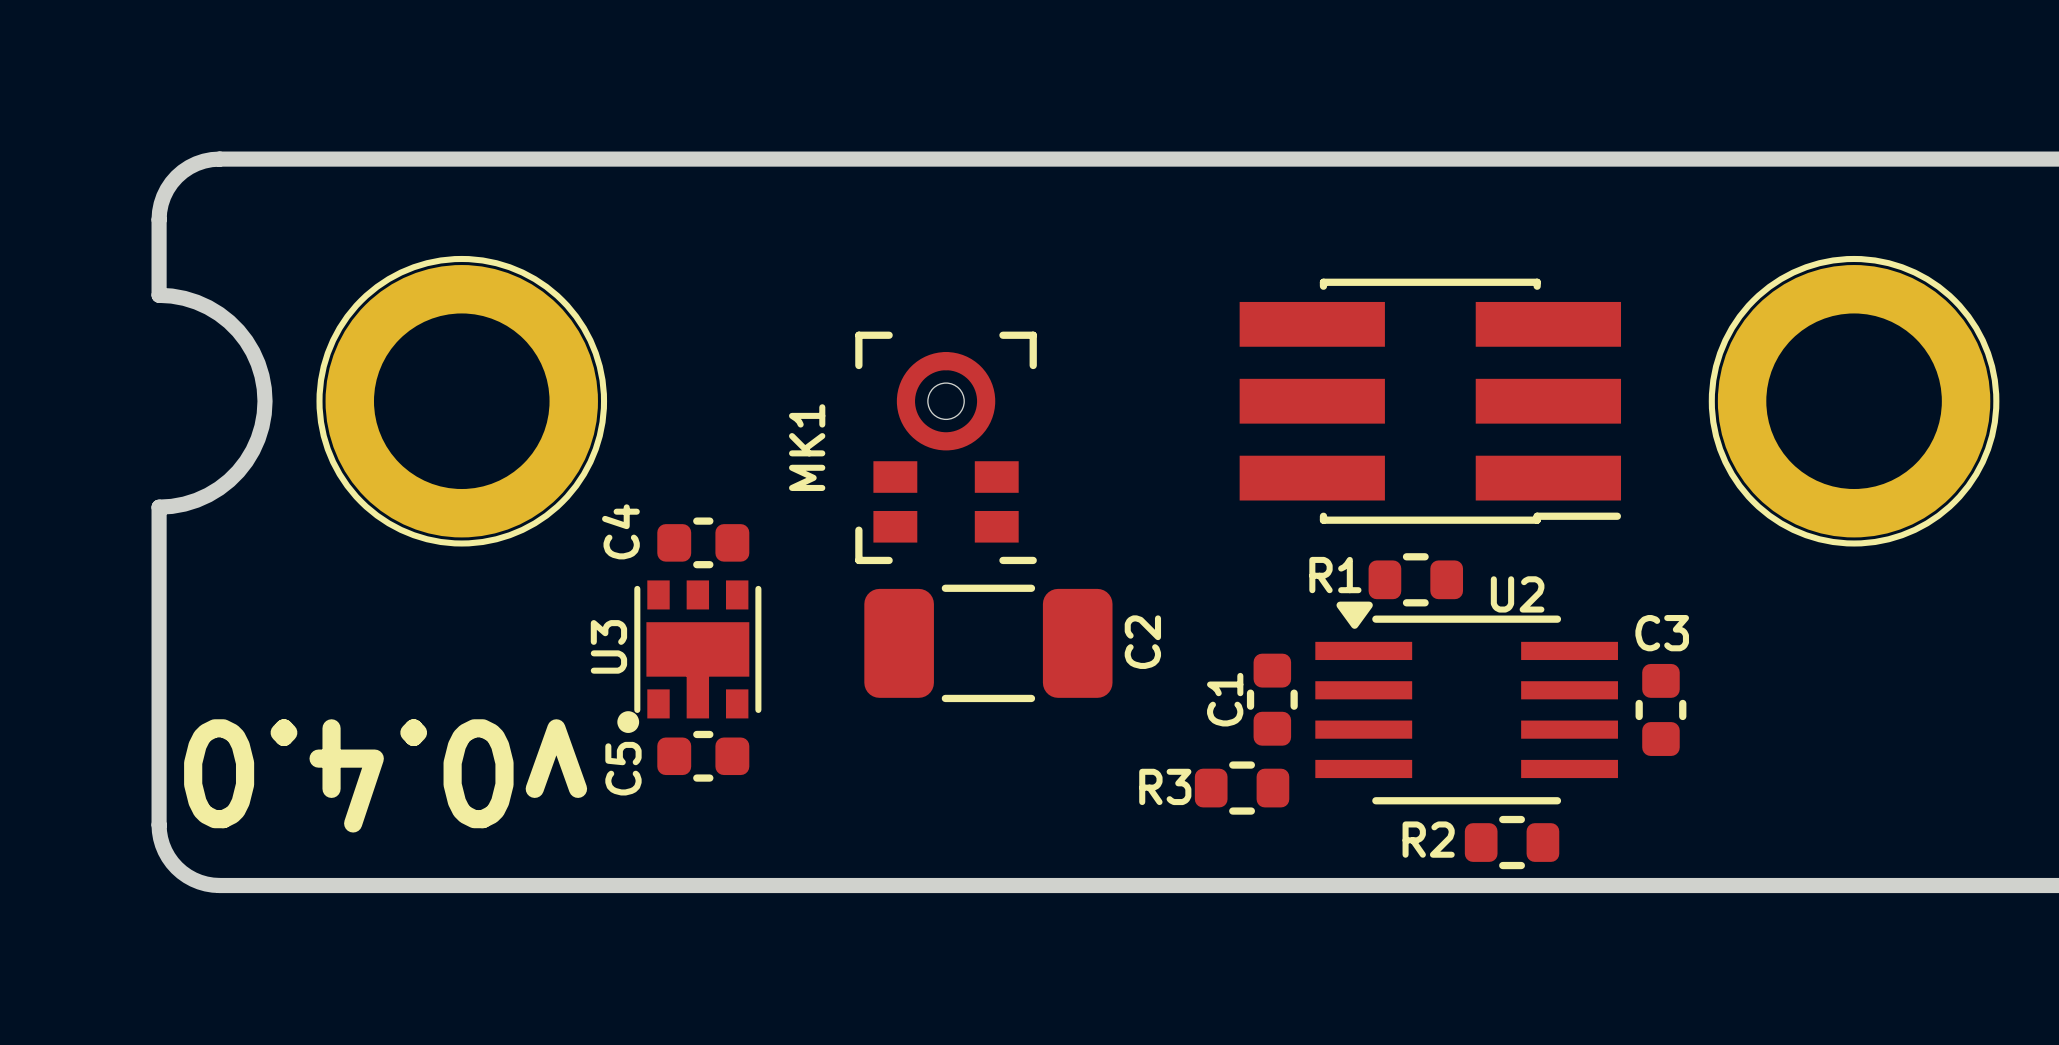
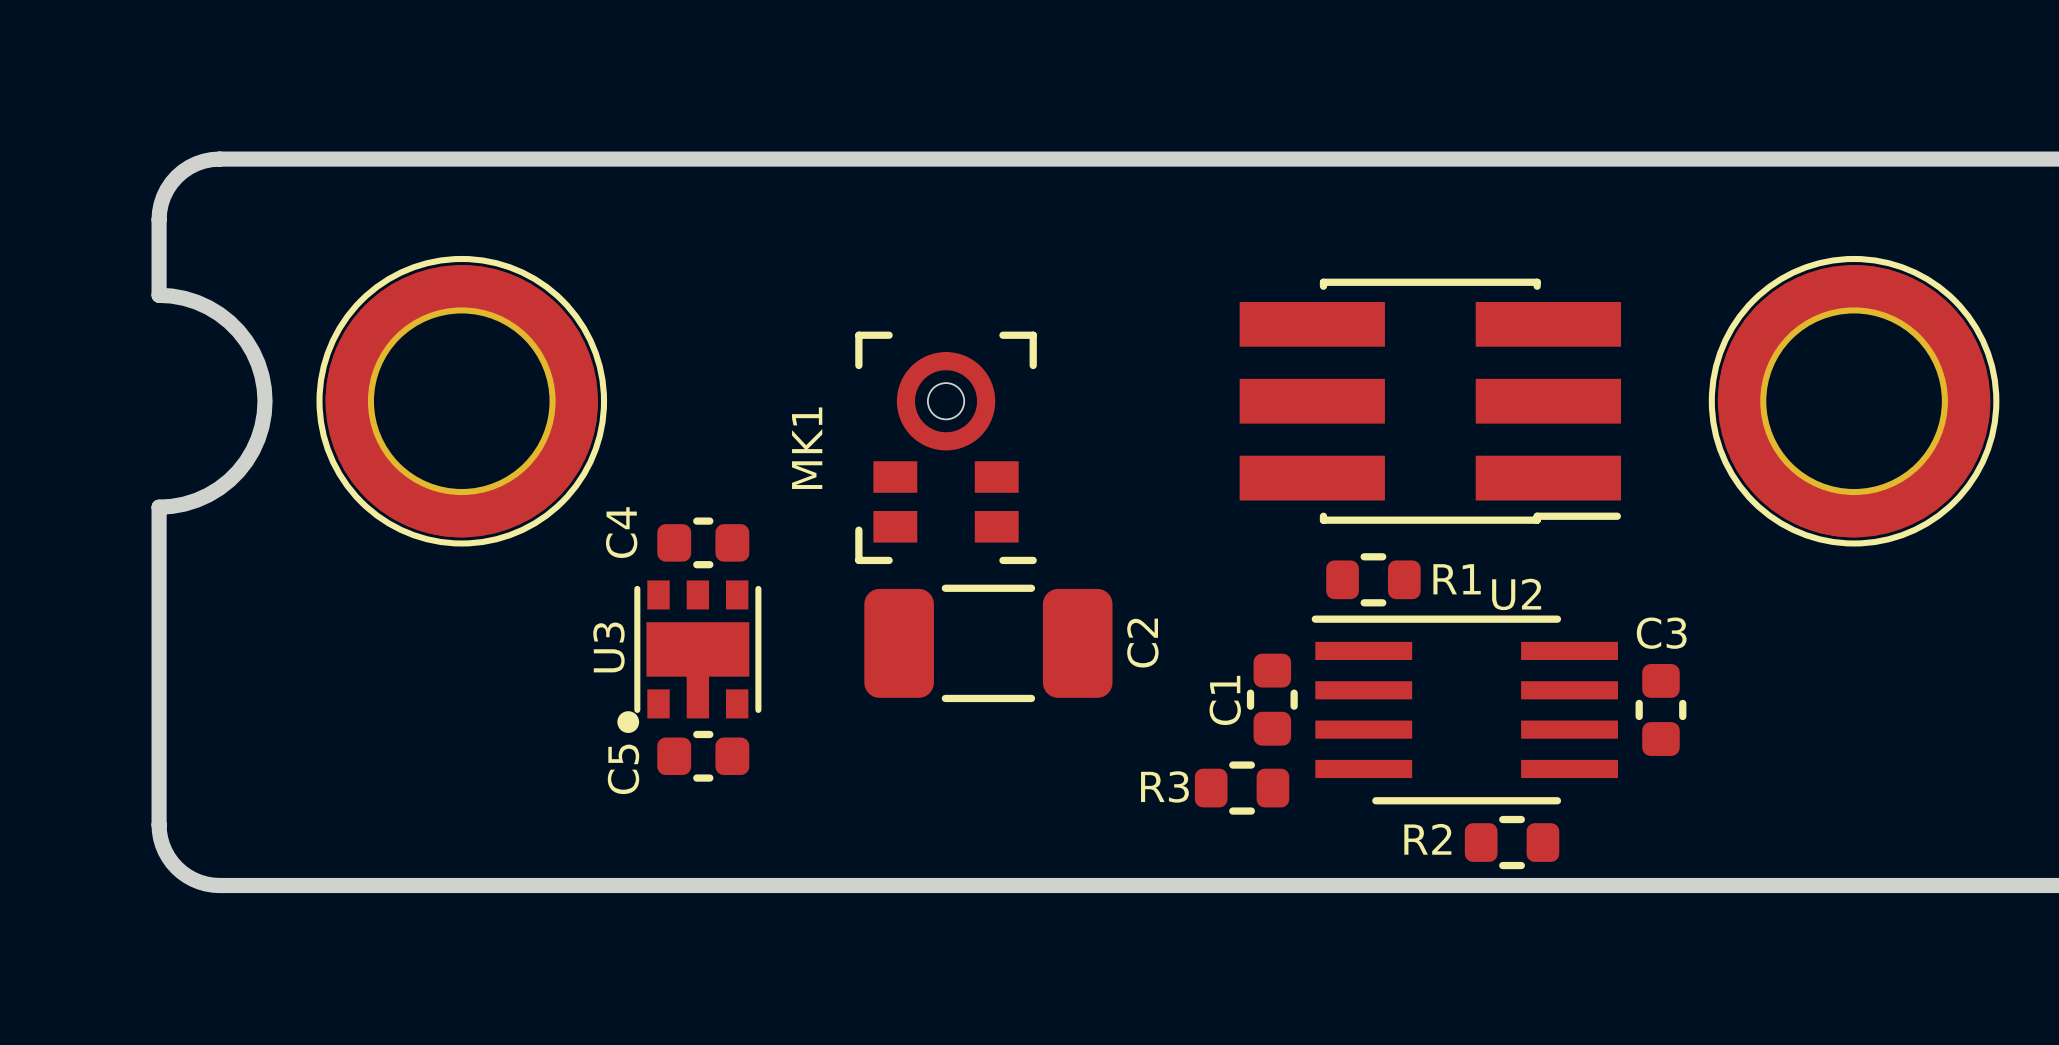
part footprint: [316, 255, 608, 547] -> [316, 255, 608, 547]
part footprint: [1708, 255, 2000, 547] -> [1708, 255, 2000, 547]
R1 name position: R1 (1335, 575) -> R1 (1457, 579)
R1 position: (1415, 579) -> (1373, 579)
U2 footprint: [1315, 601, 1618, 805] -> [1311, 615, 1618, 805]
text: v0.4.0 (385, 775) -> none

